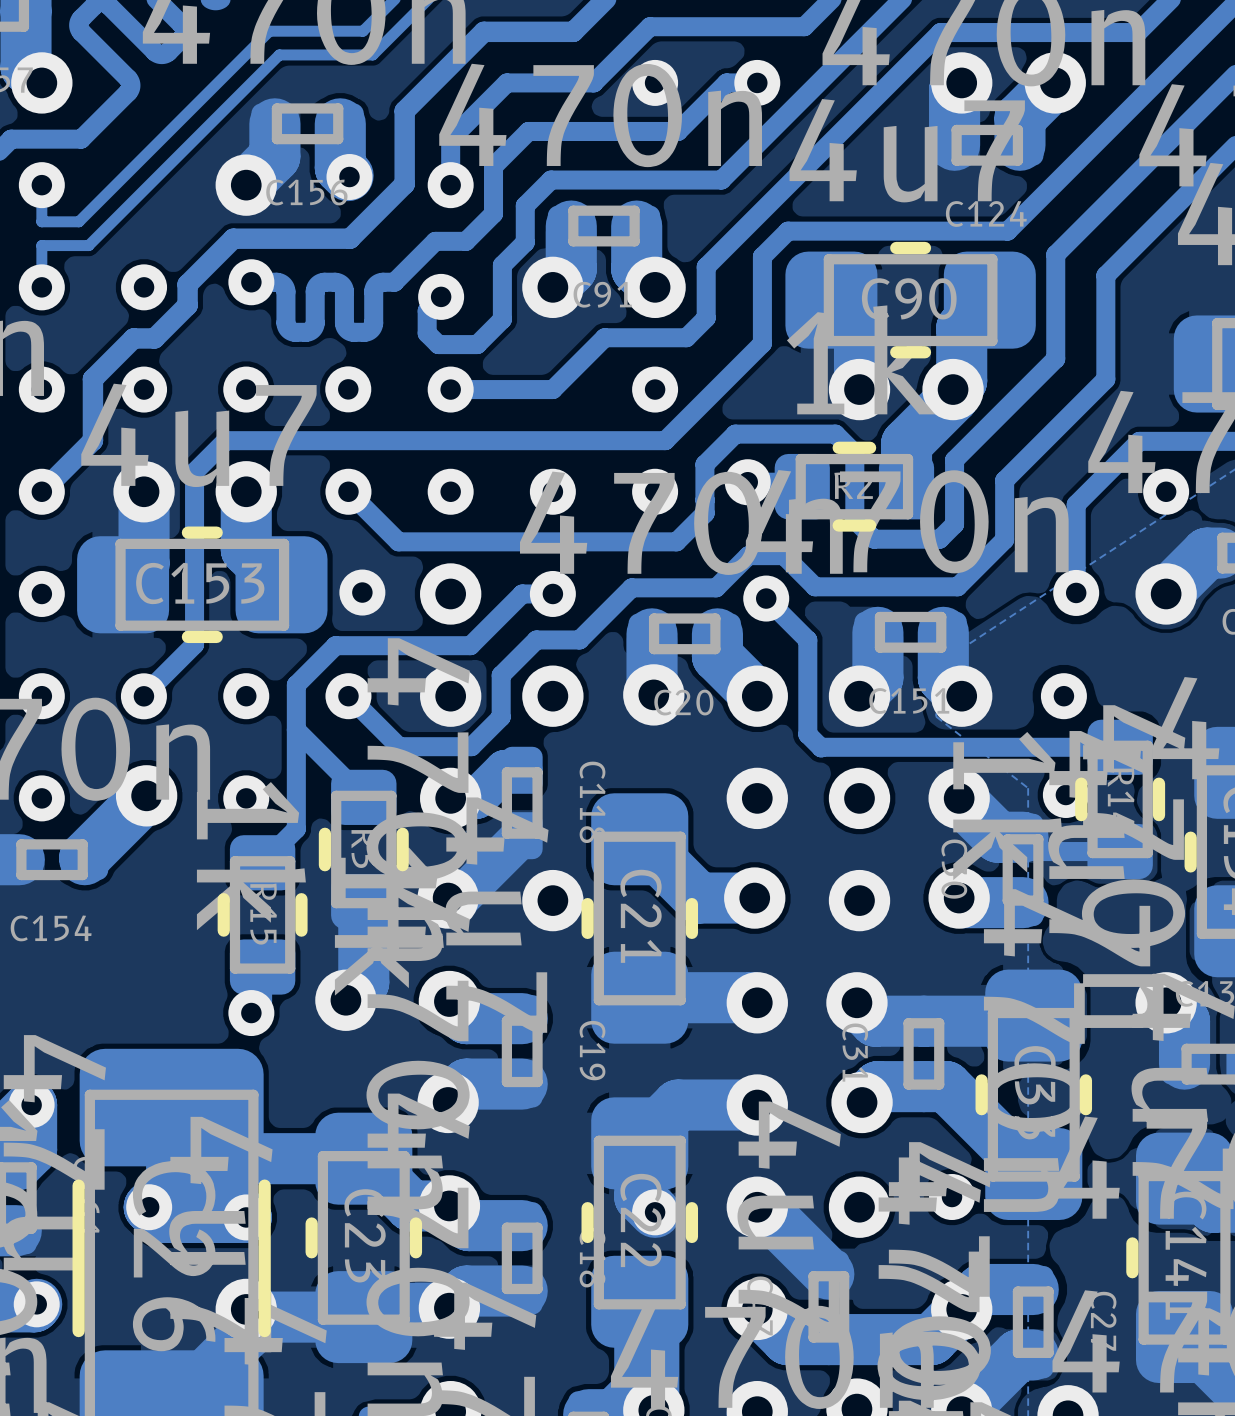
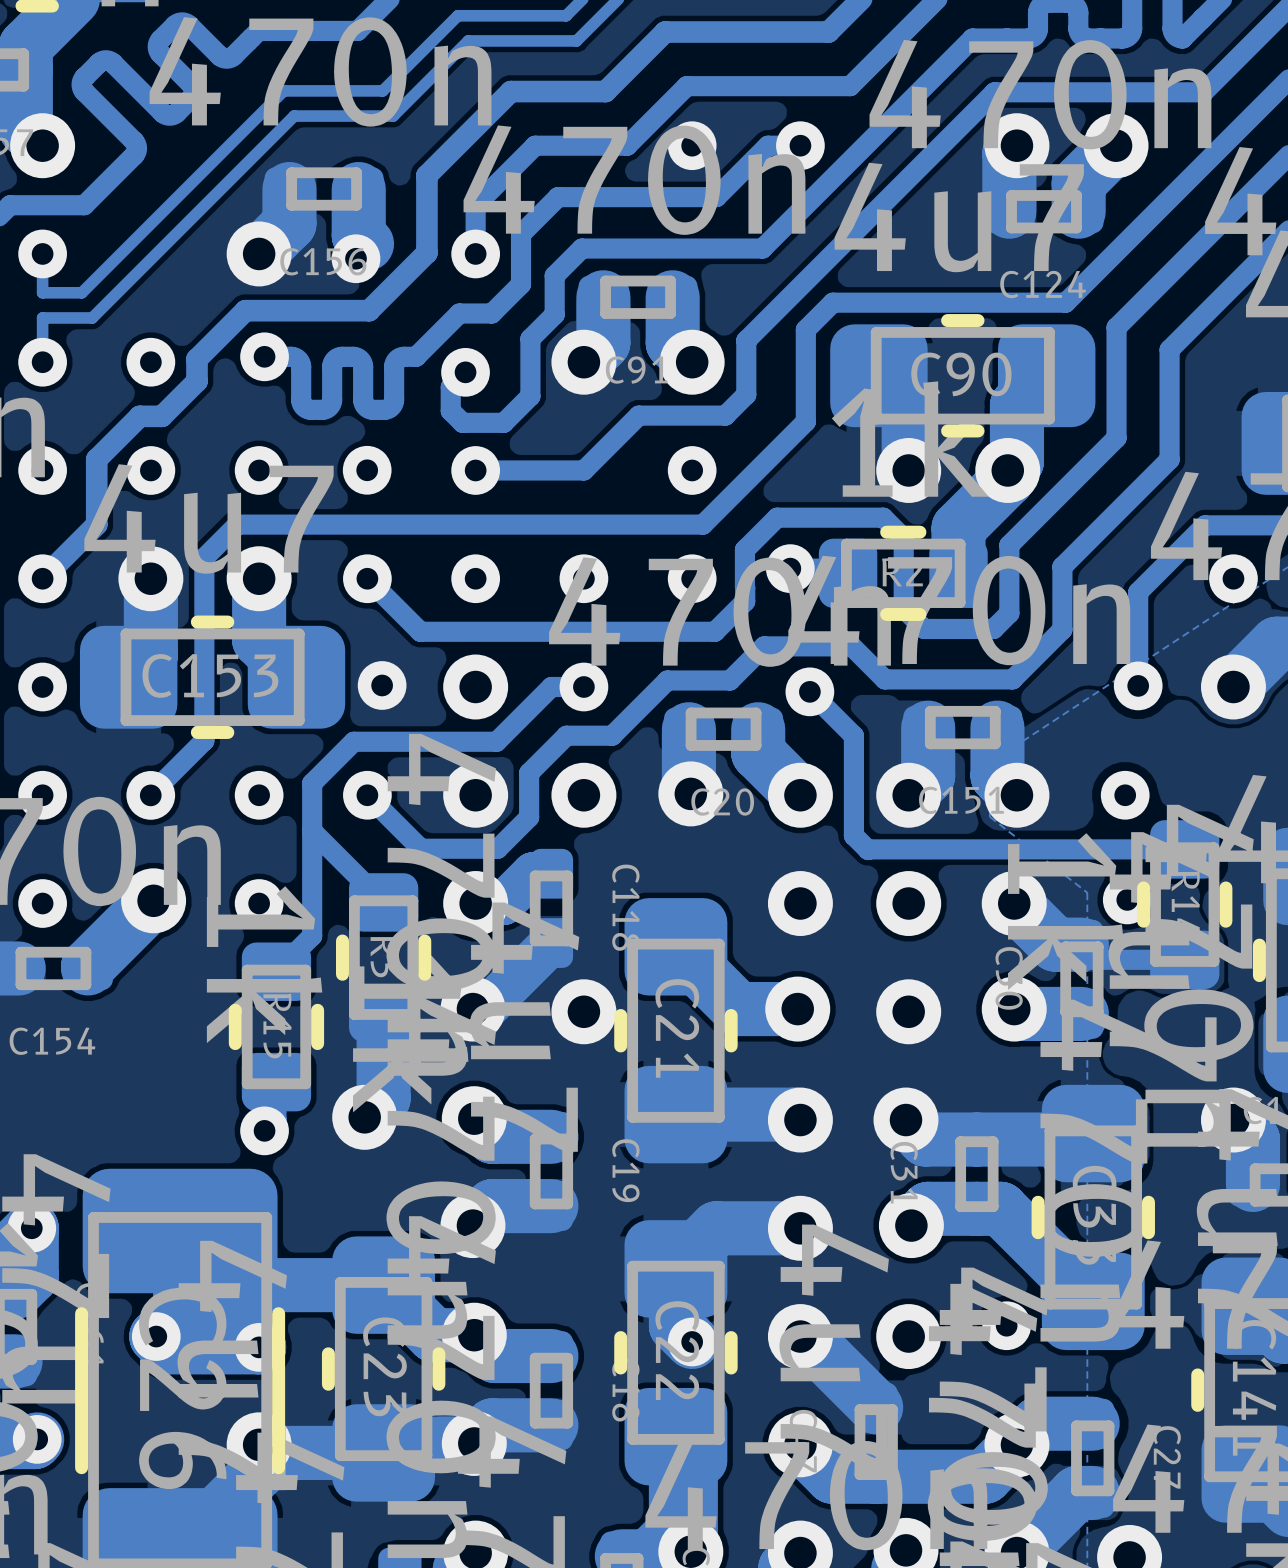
via position: (349, 177) -> (355, 258)
track: (748, 555) (716, 587) (690, 587) -> (791, 646) (764, 646) (730, 680)
track: (783, 555) (815, 586) (837, 586) -> (828, 646) (851, 646) (884, 679)

